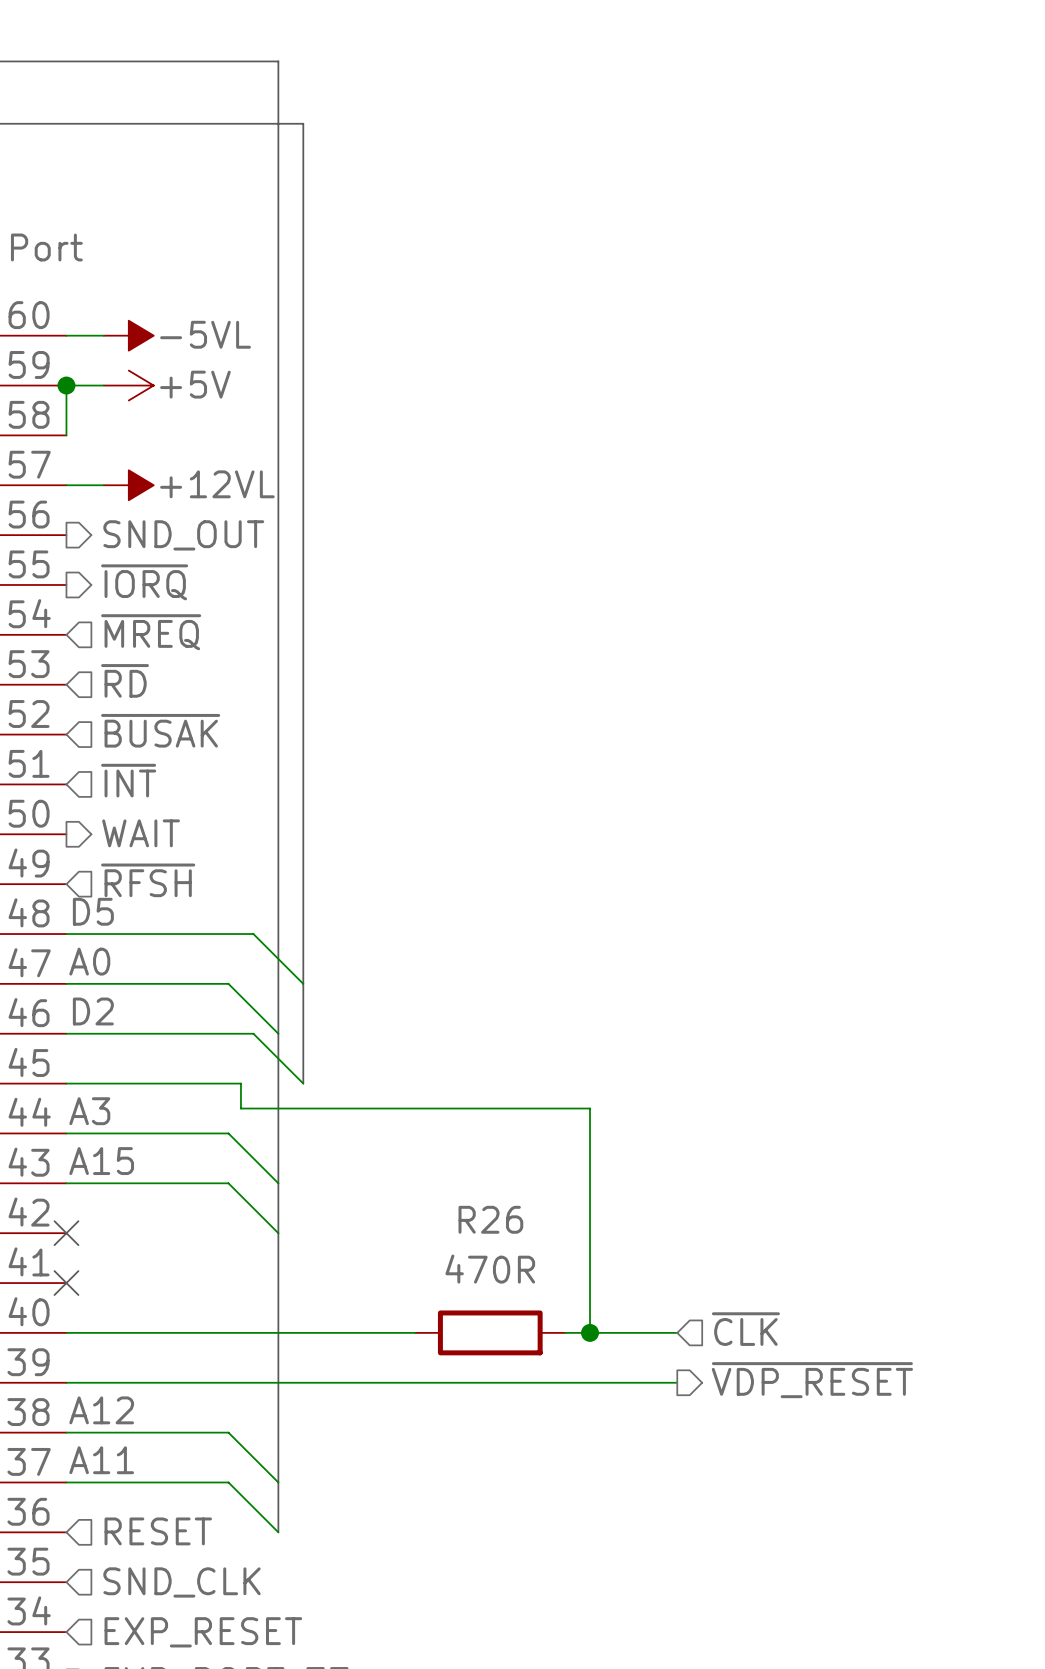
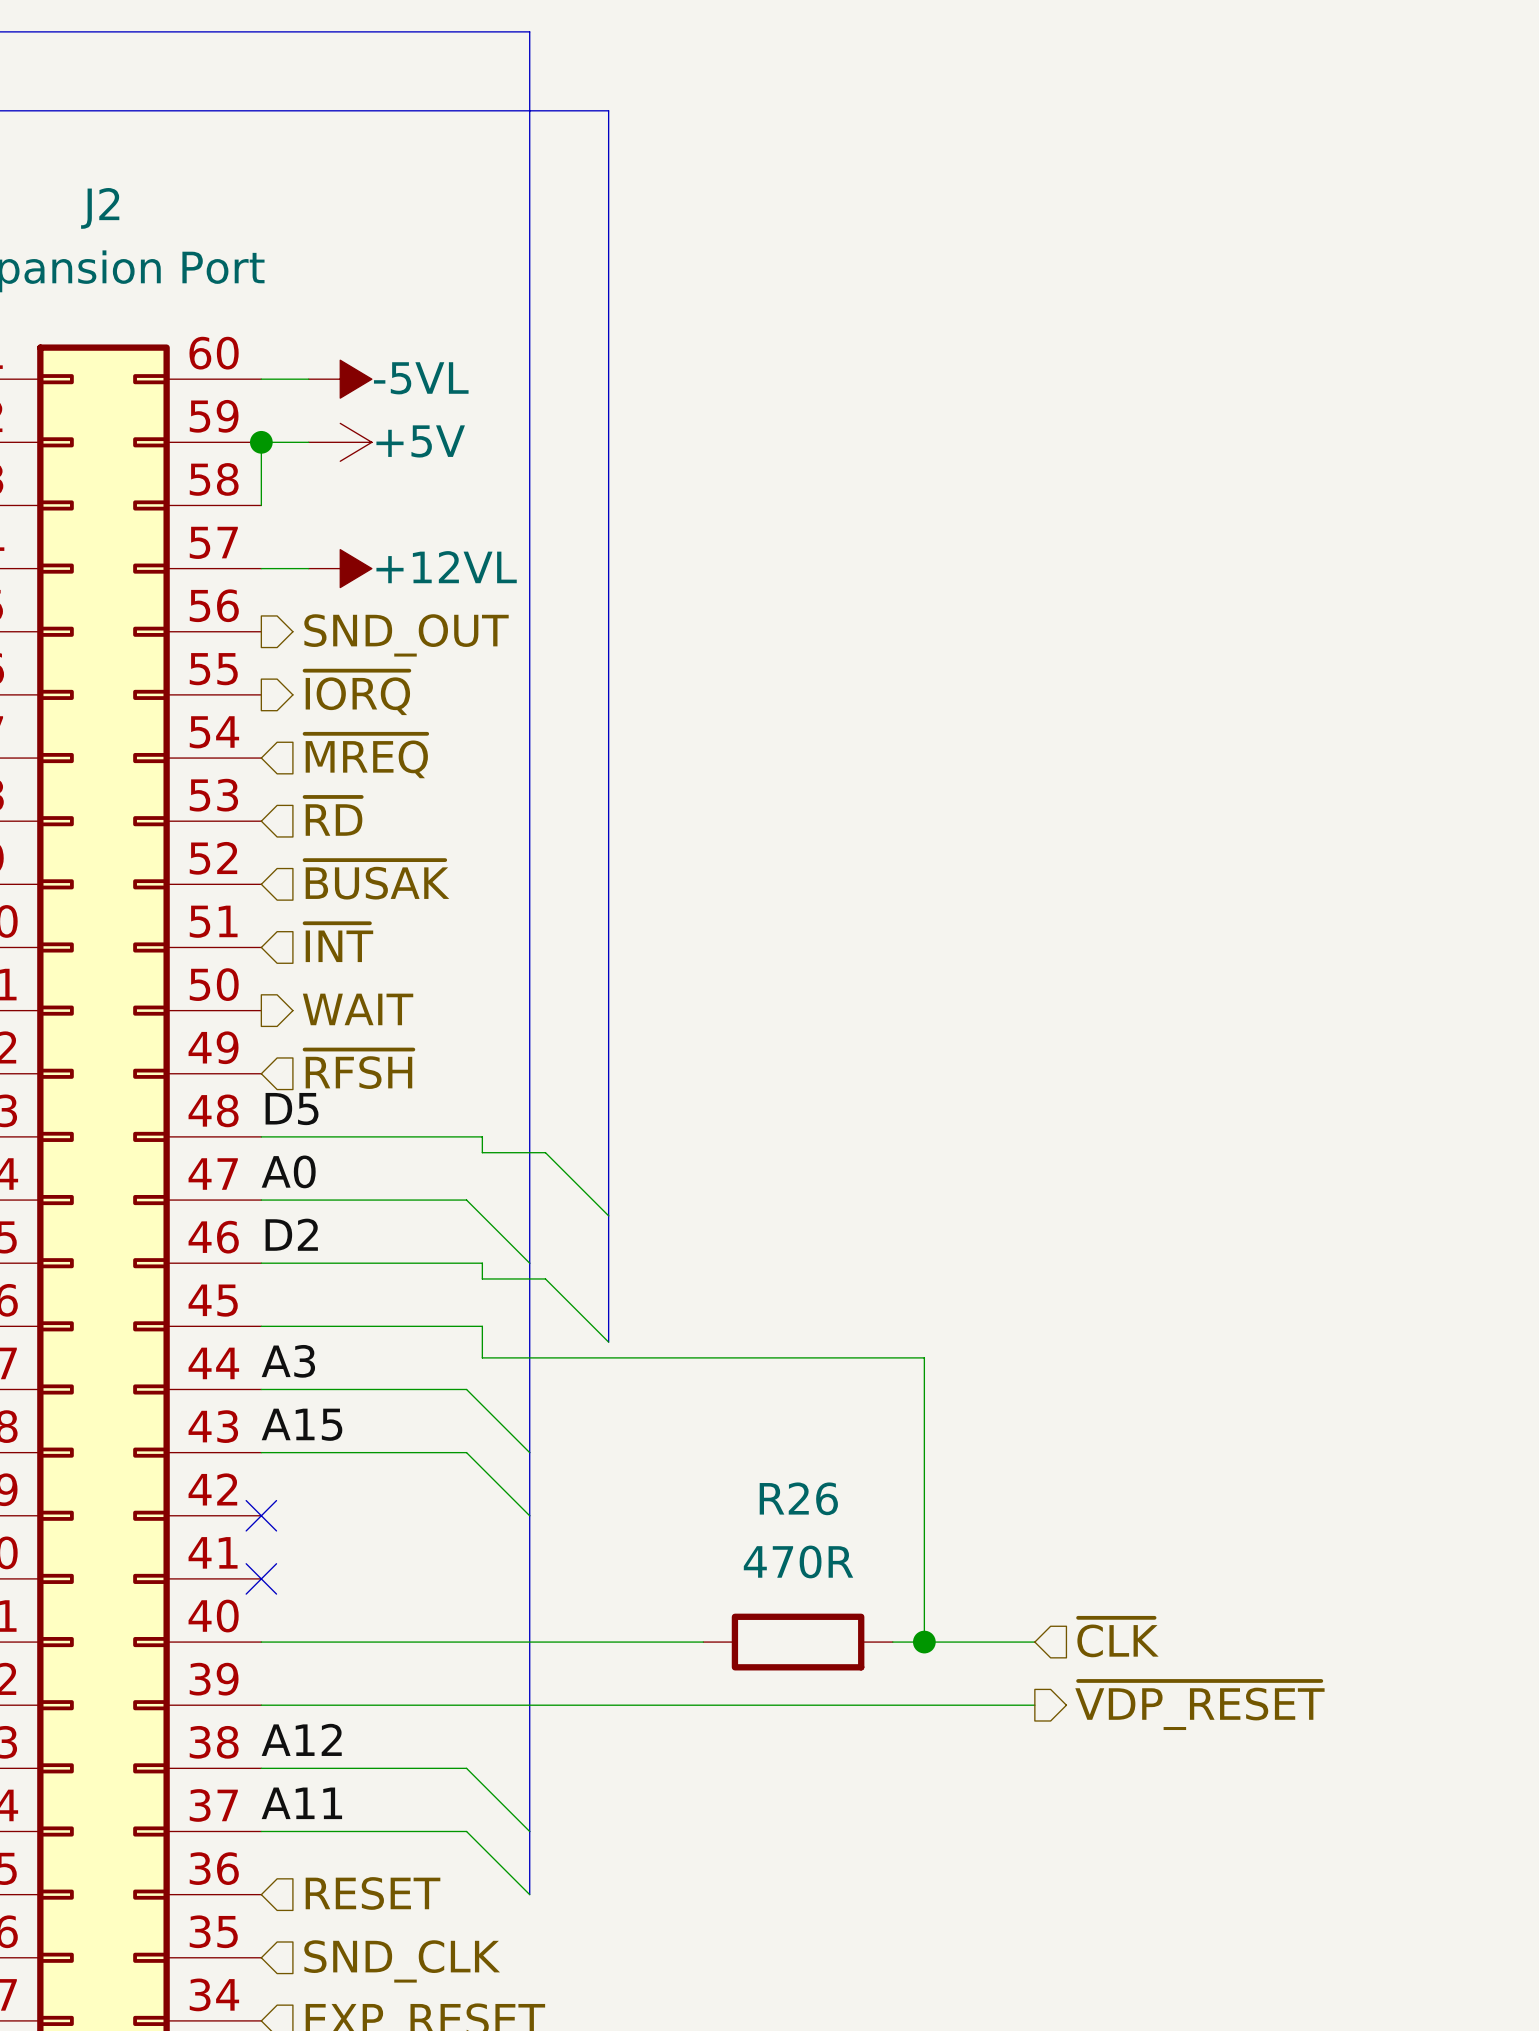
bus: (303, 123) (303, 1083) -> (561, 110) (608, 110) (608, 1342)
wire: (240, 934) (253, 934) (303, 983) -> (482, 1136) (482, 1152) (545, 1152) (608, 1215)
wire: (240, 1033) (253, 1033) (303, 1083) -> (482, 1263) (482, 1278) (545, 1278) (608, 1342)

